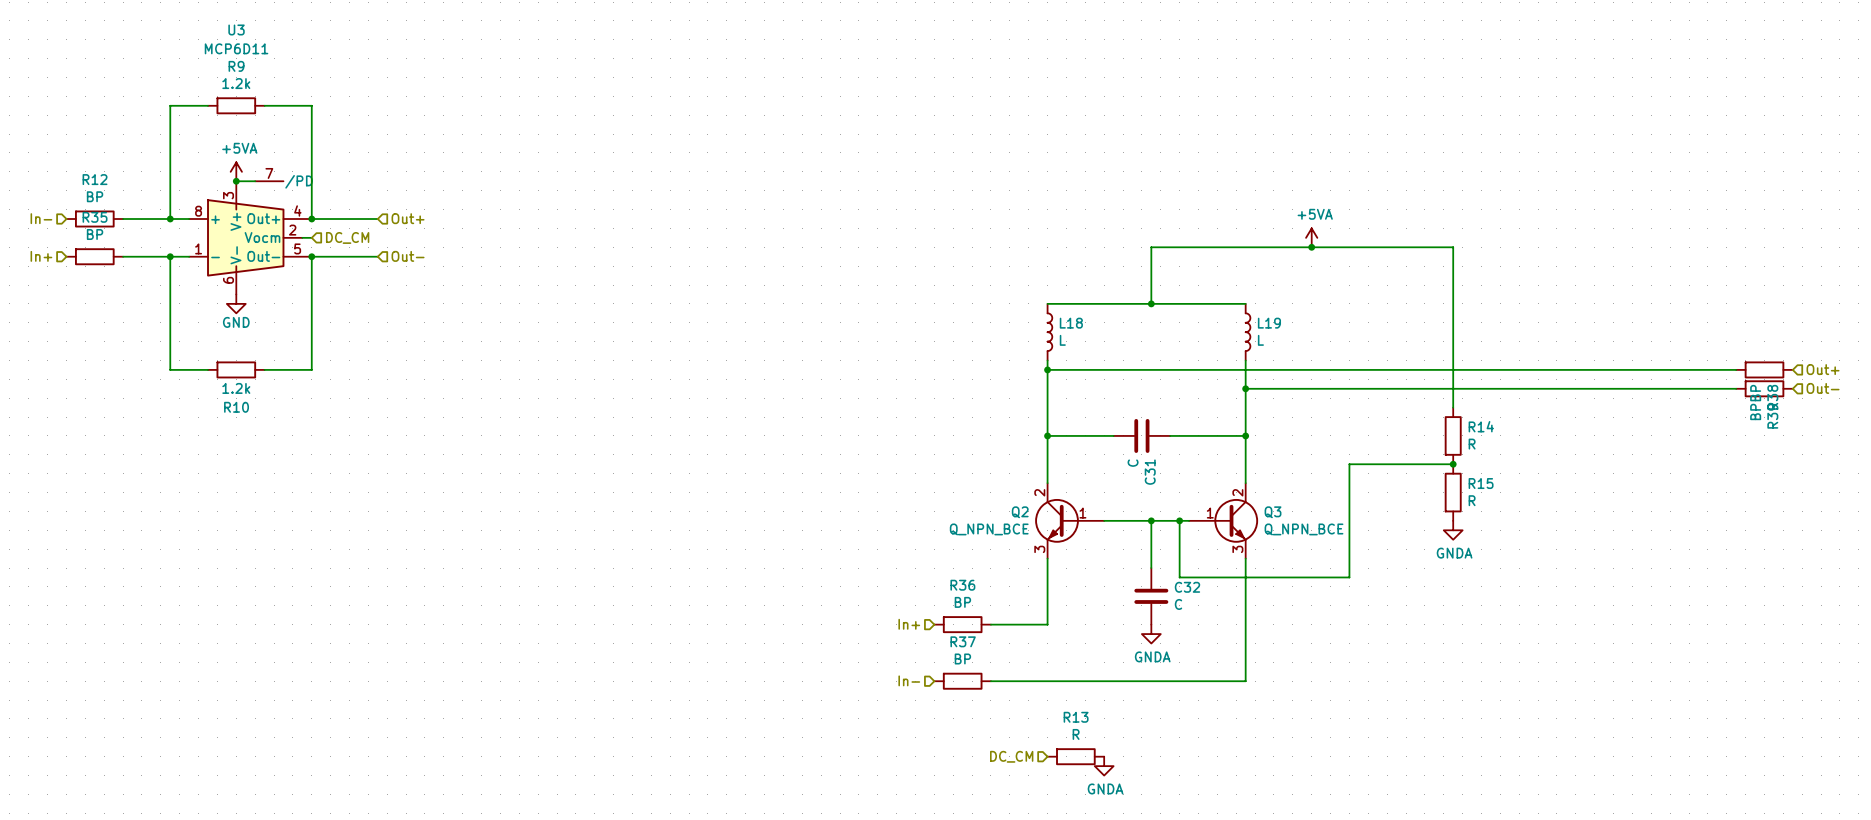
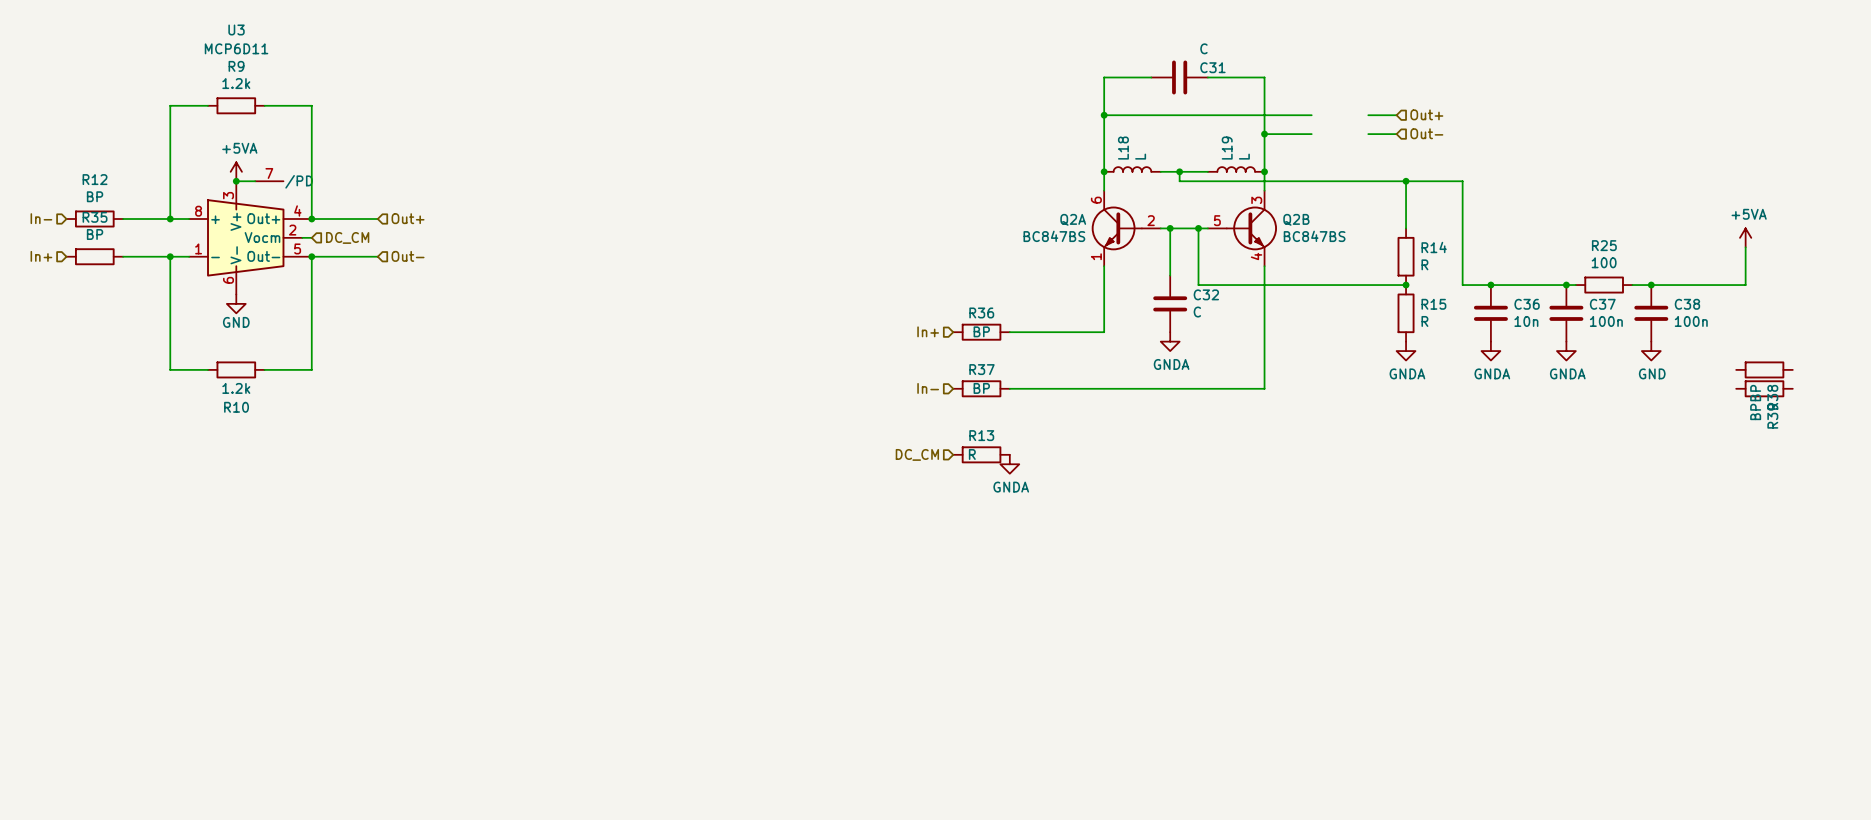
wire: none -> (1151, 77) (1104, 77) (1104, 190)
wire: none -> (1207, 77) (1264, 77) (1264, 190)
hierarchical label: none -> Out+ (1426, 114)
wire: none -> (1104, 115) (1311, 115)
junction: none -> (1104, 115)
wire: none -> (1368, 115) (1396, 115)
hierarchical label: none -> Out- (1426, 133)
wire: none -> (1264, 134) (1311, 134)
junction: none -> (1264, 134)
wire: none -> (1368, 134) (1396, 134)
junction: none -> (1104, 171)
wire: none -> (1160, 171) (1207, 171)
wire: none -> (1179, 171) (1179, 181) (1462, 181) (1462, 285) (1575, 285)
junction: none -> (1179, 171)
junction: none -> (1264, 171)
wire: none -> (1406, 181) (1406, 228)
junction: none -> (1406, 181)
Q2A: none -> BC847BS (1126, 228)
wire: none -> (1160, 228) (1207, 228)
wire: none -> (1170, 228) (1170, 275)
junction: none -> (1170, 228)
wire: none -> (1198, 228) (1198, 285) (1406, 285)
junction: none -> (1198, 228)
Q2B: none -> BC847BS (1242, 228)
power symbol: +5VA (1311, 237) -> none
power symbol: none -> +5VA (1745, 237)
junction: (1311, 247) -> none
wire: none -> (1745, 247) (1745, 285) (1632, 285)
wire: none -> (1104, 266) (1104, 332) (1009, 332)
junction: none -> (1406, 285)
junction: none -> (1490, 285)
junction: none -> (1566, 285)
R25: none -> 100 (1604, 285)
junction: none -> (1651, 285)
wire: (1047, 303) (1245, 303) -> none
wire: (1151, 303) (1151, 247) (1453, 247) (1453, 407) -> none
junction: (1151, 303) -> none
C36: none -> 10n (1490, 313)
C37: none -> 100n (1566, 313)
C38: none -> 100n (1651, 313)
hierarchical label: none -> In+ (928, 331)
L18 rotation: 0° (1049, 332) -> 90° counterclockwise (1132, 169)
L18 position: (1049, 332) -> (1132, 169)
L19 rotation: 0° (1248, 332) -> 90° counterclockwise (1236, 169)
L19 position: (1248, 332) -> (1236, 169)
power symbol: none -> GNDA (1170, 341)
power symbol: none -> GNDA (1406, 351)
power symbol: none -> GNDA (1490, 351)
power symbol: none -> GNDA (1566, 351)
power symbol: none -> GND (1651, 351)
wire: (1047, 360) (1047, 483) -> none
wire: (1245, 360) (1245, 483) -> none
wire: (1047, 369) (1736, 369) -> none
junction: (1047, 369) -> none
hierarchical label: Out+ (1823, 369) -> none
hierarchical label: none -> In- (928, 388)
wire: none -> (1009, 388) (1245, 388)
junction: (1245, 388) -> none
wire: (1264, 388) (1736, 388) -> (1264, 388) (1264, 266)
hierarchical label: Out- (1823, 388) -> none
wire: (1047, 435) (1113, 435) -> none
junction: (1047, 435) -> none
C31 position: (1141, 435) -> (1179, 77)
wire: (1170, 435) (1245, 435) -> none
junction: (1245, 435) -> none
R14 position: (1453, 435) -> (1406, 256)
hierarchical label: none -> DC_CM (917, 454)
C31 value rotation: 0° (1133, 463) -> 90° clockwise (1203, 48)
C31 value position: C (1133, 463) -> C (1203, 48)
power symbol: none -> GNDA (1009, 464)
wire: (1453, 464) (1349, 464) (1349, 577) (1179, 577) (1179, 520) -> none
junction: (1453, 464) -> none
C31 name rotation: 0° (1150, 472) -> 90° clockwise (1212, 67)
C31 name position: C31 (1150, 472) -> C31 (1212, 67)
R15 position: (1453, 492) -> (1406, 313)
Q2: Q_NPN_BCE (1069, 520) -> none
wire: (1104, 520) (1189, 520) -> none
wire: (1151, 520) (1151, 568) -> none
junction: (1151, 520) -> none
junction: (1179, 520) -> none
Q3: Q_NPN_BCE (1223, 520) -> none
power symbol: GNDA (1453, 530) -> none
wire: (1047, 558) (1047, 624) (990, 624) -> none
wire: (1245, 558) (1245, 681) (990, 681) -> none
R36 name position: R36 (962, 585) -> R36 (981, 312)
C32 position: (1151, 596) -> (1170, 303)
R36 value position: BP (962, 602) -> BP (981, 331)
hierarchical label: In+ (909, 624) -> none
R36 position: (962, 624) -> (981, 332)
power symbol: GNDA (1151, 634) -> none
R37 name position: R37 (963, 641) -> R37 (981, 369)
R37 value position: BP (962, 658) -> BP (981, 388)
hierarchical label: In- (909, 680) -> none
R37 position: (962, 681) -> (981, 388)
R13 name position: R13 (1076, 717) -> R13 (981, 435)
R13 value position: R (1076, 734) -> R (972, 454)
hierarchical label: DC_CM (1011, 756) -> none
R13 position: (1075, 756) -> (981, 454)
power symbol: GNDA (1104, 766) -> none

